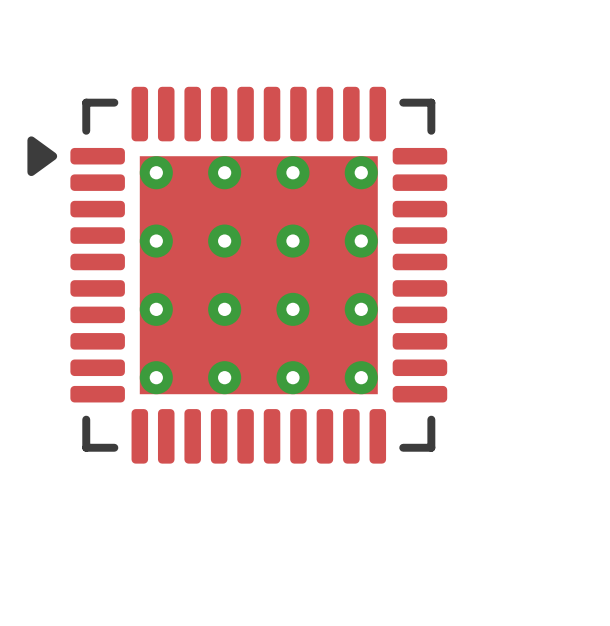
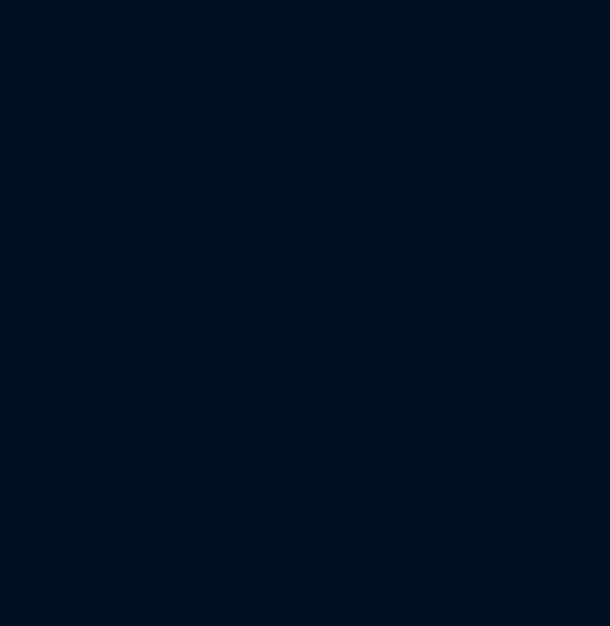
part: (237, 275) -> none

